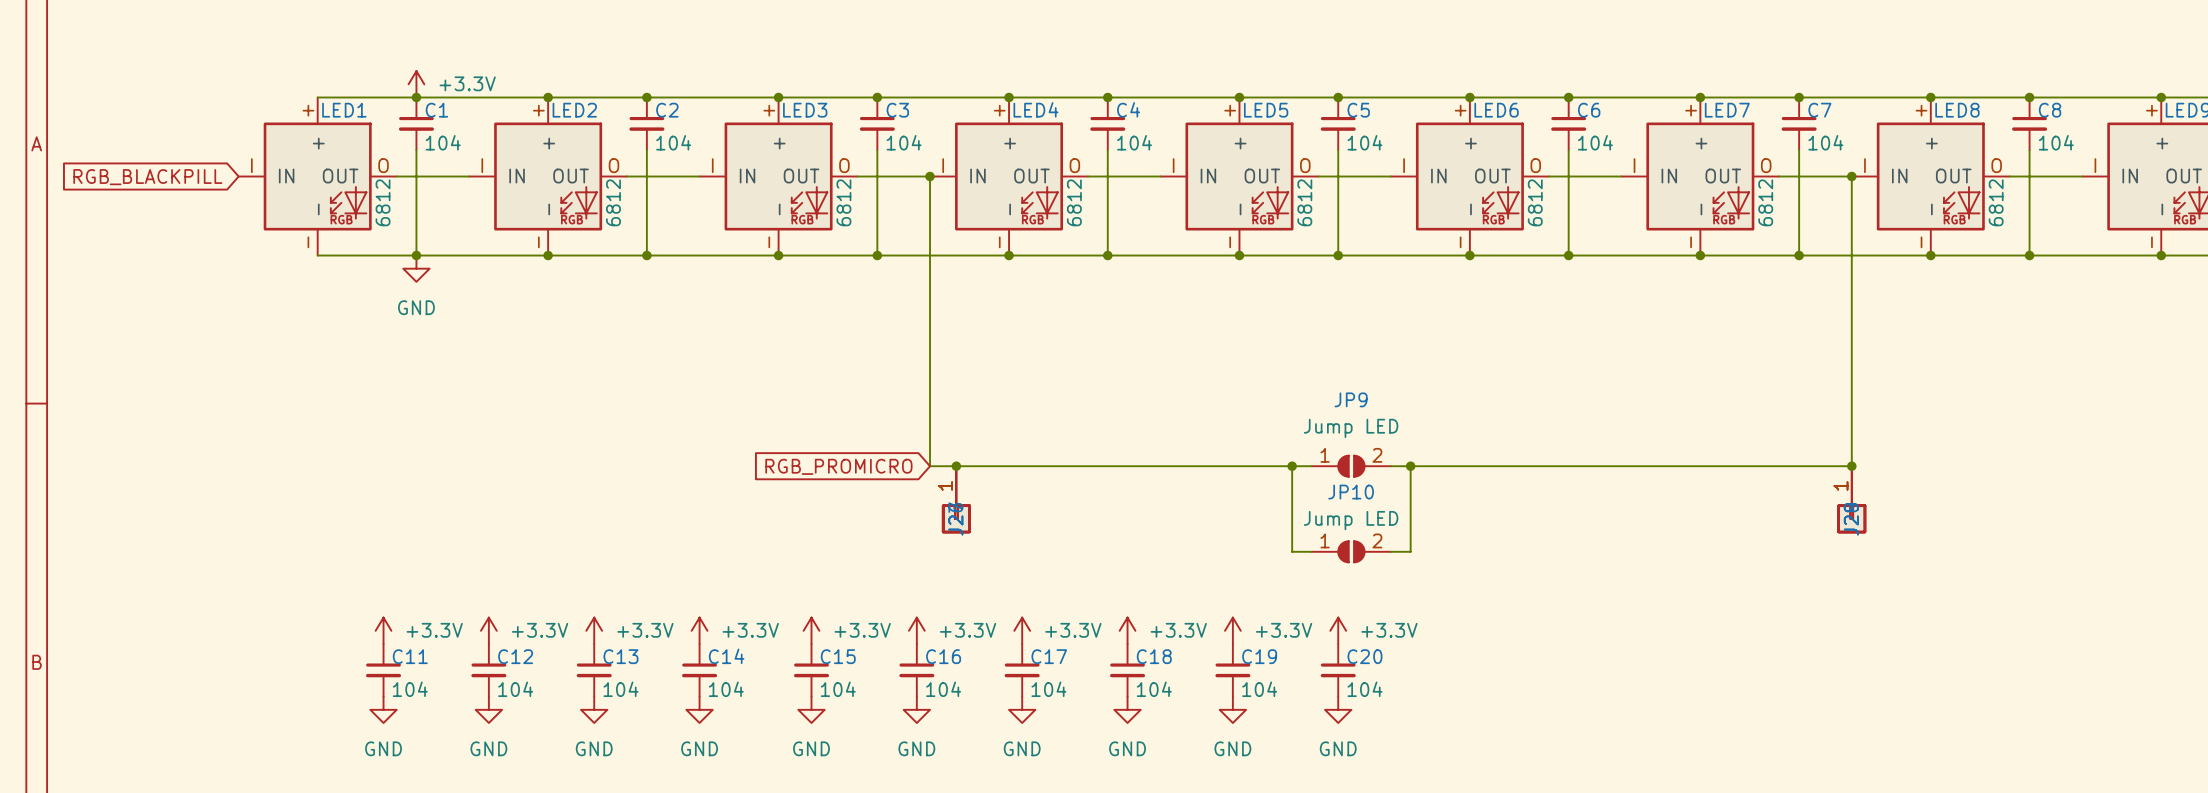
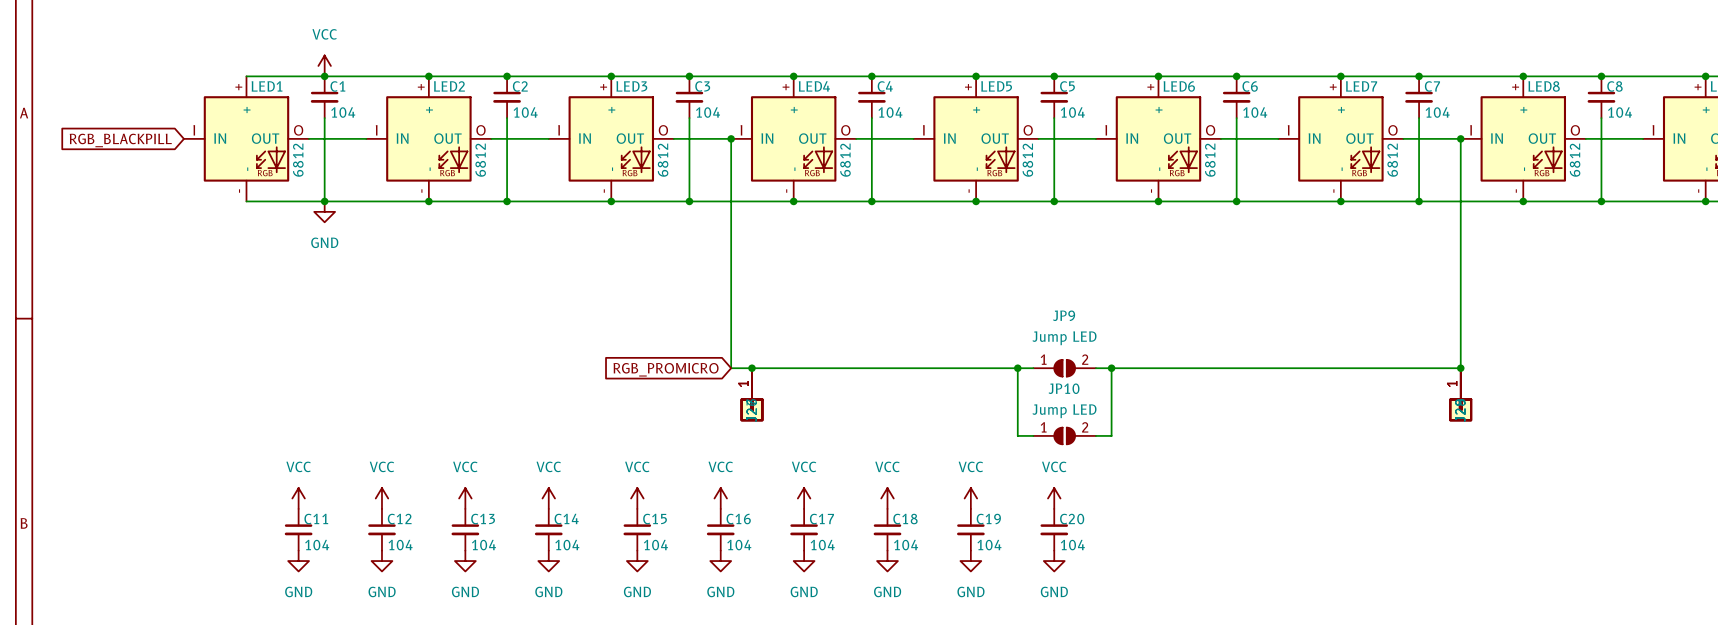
power symbol: +3.3V (416, 84) -> VCC (324, 65)
power symbol: +3.3V (383, 630) -> VCC (298, 498)
power symbol: +3.3V (488, 630) -> VCC (381, 498)
power symbol: +3.3V (594, 630) -> VCC (465, 498)
power symbol: +3.3V (699, 630) -> VCC (548, 498)
power symbol: +3.3V (811, 630) -> VCC (637, 498)
power symbol: +3.3V (916, 630) -> VCC (720, 498)
power symbol: +3.3V (1022, 630) -> VCC (804, 498)
power symbol: +3.3V (1127, 630) -> VCC (887, 498)
power symbol: +3.3V (1232, 630) -> VCC (970, 498)
power symbol: +3.3V (1338, 630) -> VCC (1054, 498)

